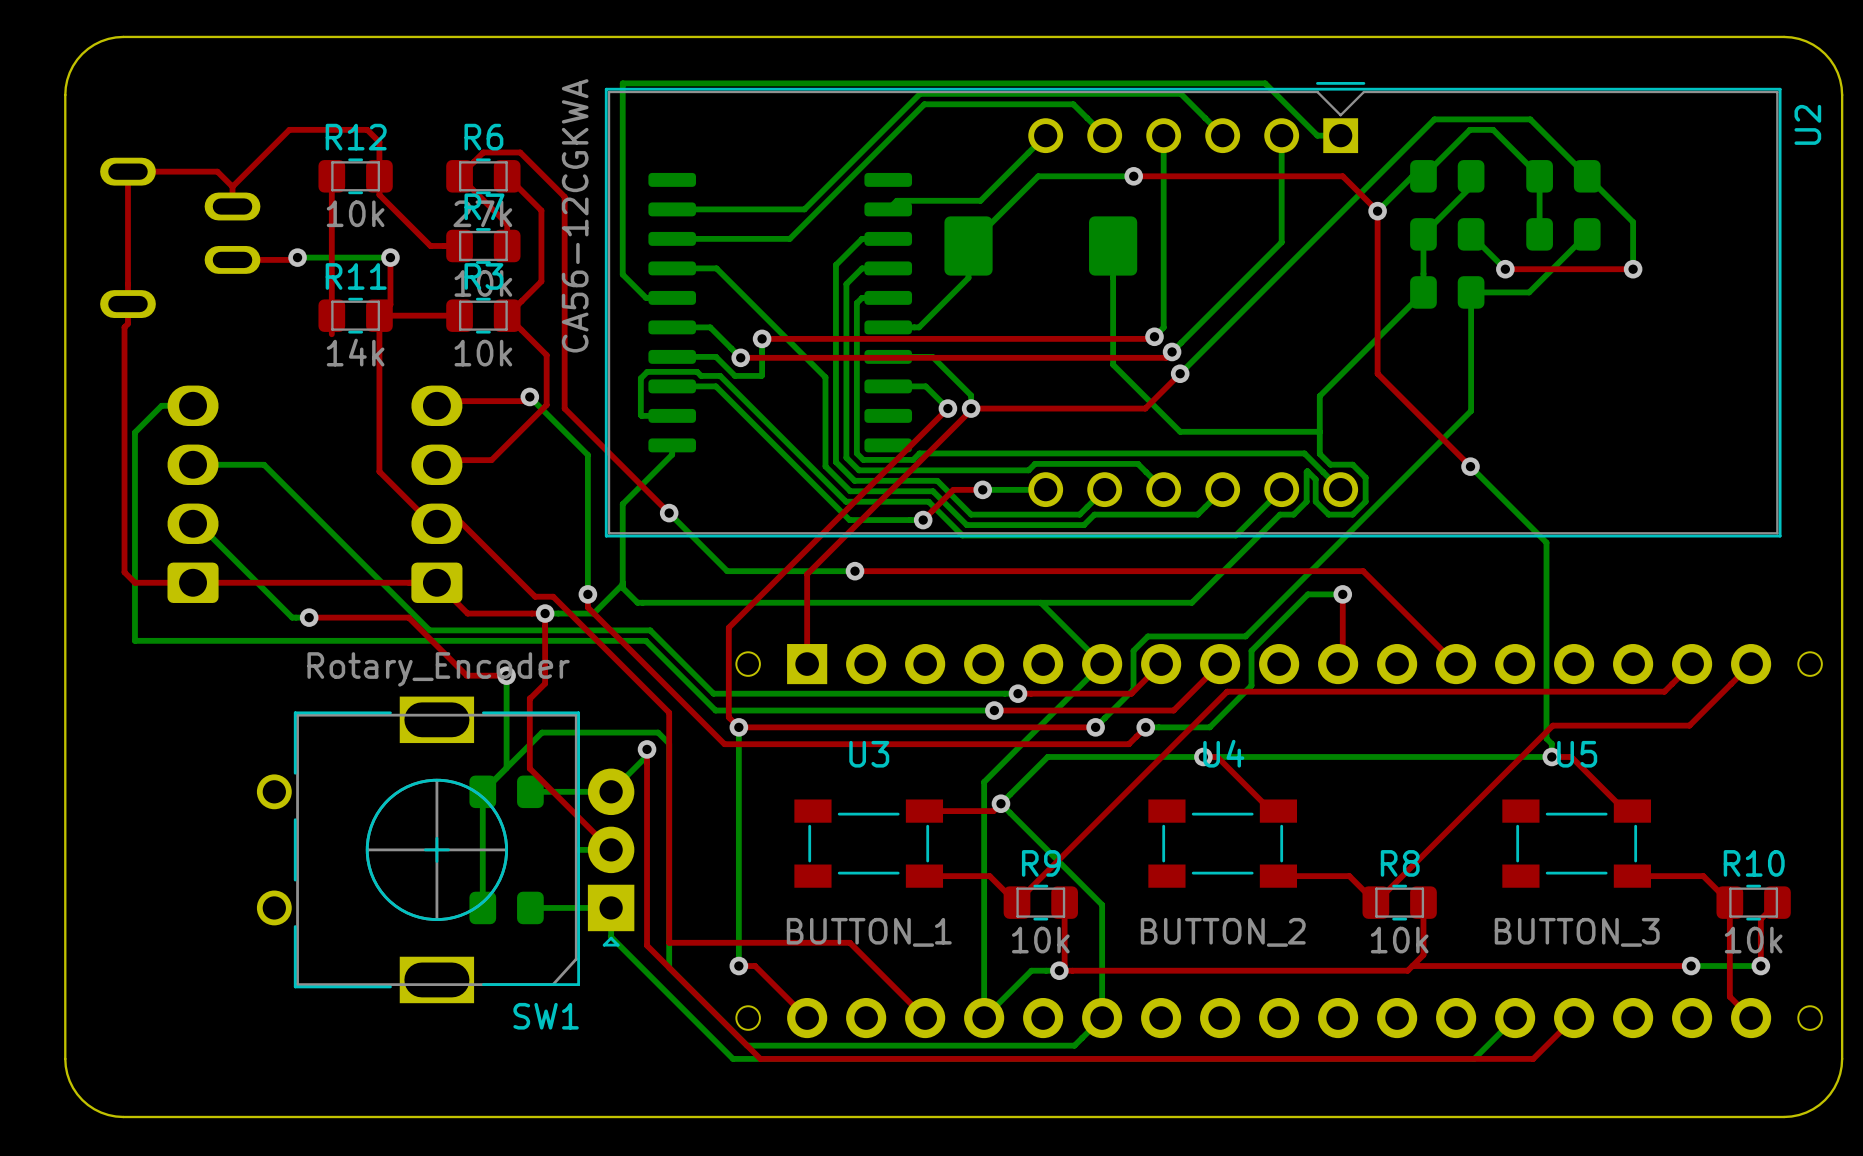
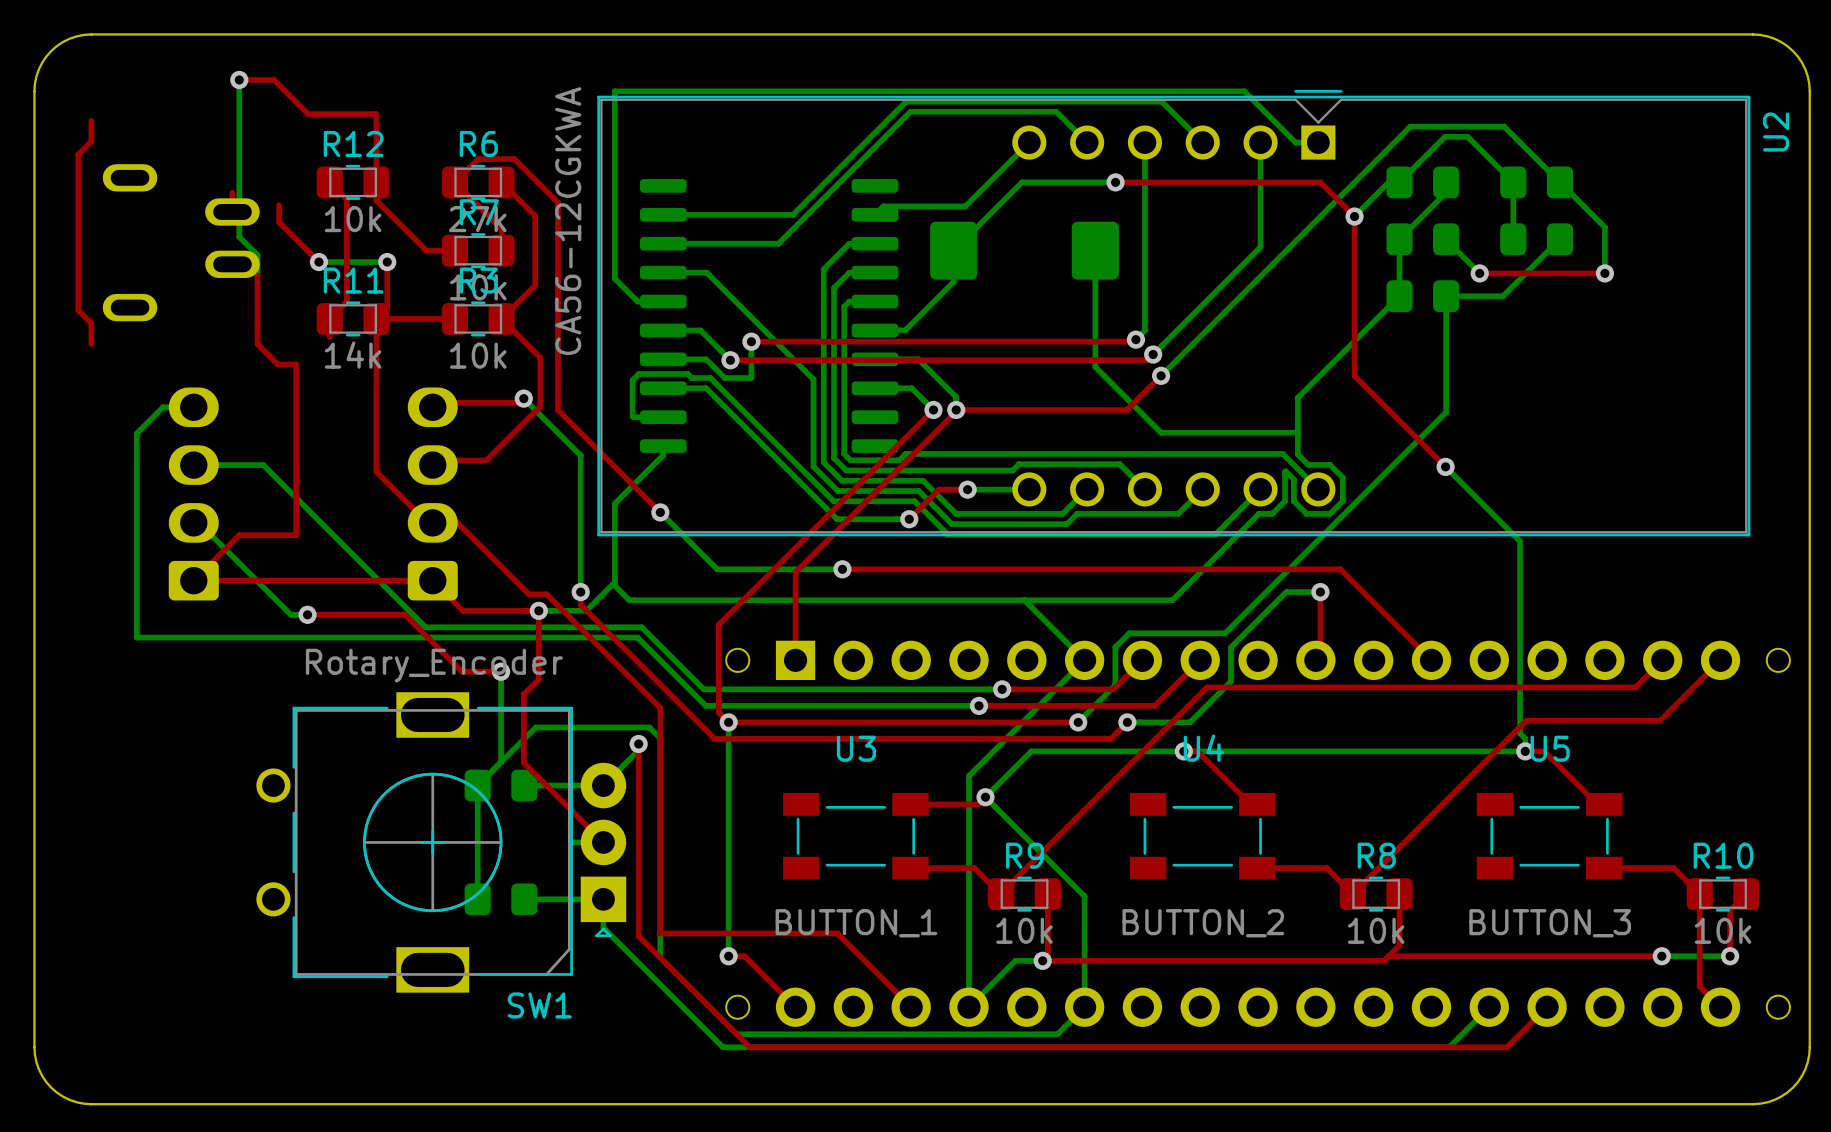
top track: none -> (239, 79) (274, 79) (308, 114) (375, 114) (376, 148)
bottom track: none -> (239, 79) (239, 236) (257, 255) (257, 275)
via: none -> (239, 79)
board edge: (1842, 95) (1837, 72) (1825, 53) (1806, 41) (1784, 36) (123, 36) (108, 38) (94, 44) (82, 53) (73, 65) (67, 79) (65, 95) (65, 1058) (69, 1081) (82, 1099) (101, 1112) (123, 1116) -> (1809, 102) (1807, 76) (1798, 56) (1787, 46) (1774, 38) (1752, 34) (91, 34) (76, 36) (62, 42) (51, 51) (42, 62) (36, 76) (34, 91) (34, 1047) (36, 1062) (42, 1075) (51, 1087) (62, 1096) (83, 1103) (125, 1104)
top track: none -> (91, 120) (91, 141) (78, 154) (78, 310) (91, 323) (91, 343)
top track: (379, 142) (367, 129) (289, 129) (232, 186) (217, 171) (127, 171) (127, 323) (124, 327) (124, 572) (134, 582) (193, 582) -> (257, 275) (257, 344) (277, 364) (296, 364) (296, 535) (239, 535) (193, 580)
top track: (331, 176) (331, 315) -> (329, 182) (346, 199) (346, 301) (329, 318)
top track: none -> (279, 205) (279, 222) (318, 262)
top track: (297, 257) (295, 259) (232, 259) -> none
bottom track: (297, 257) (320, 257) -> none
via position: (297, 257) -> (318, 262)

